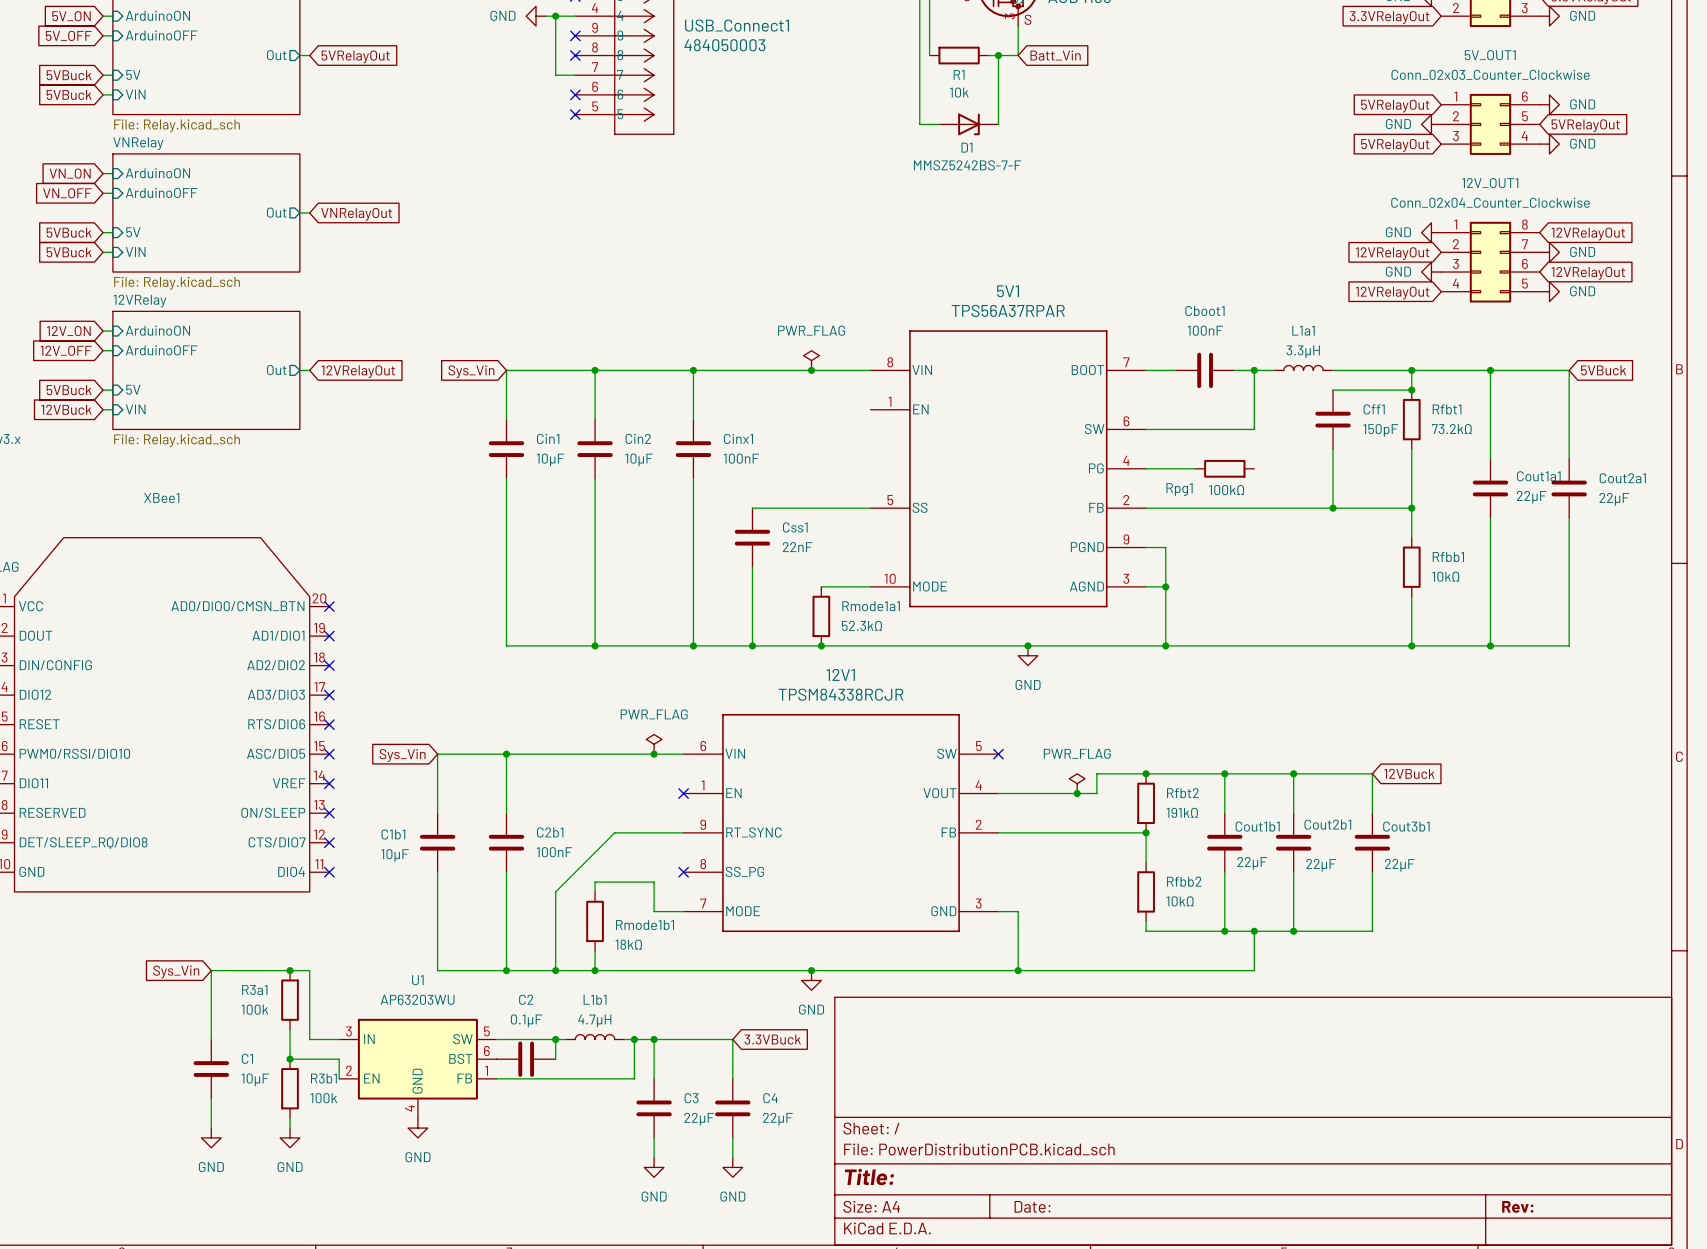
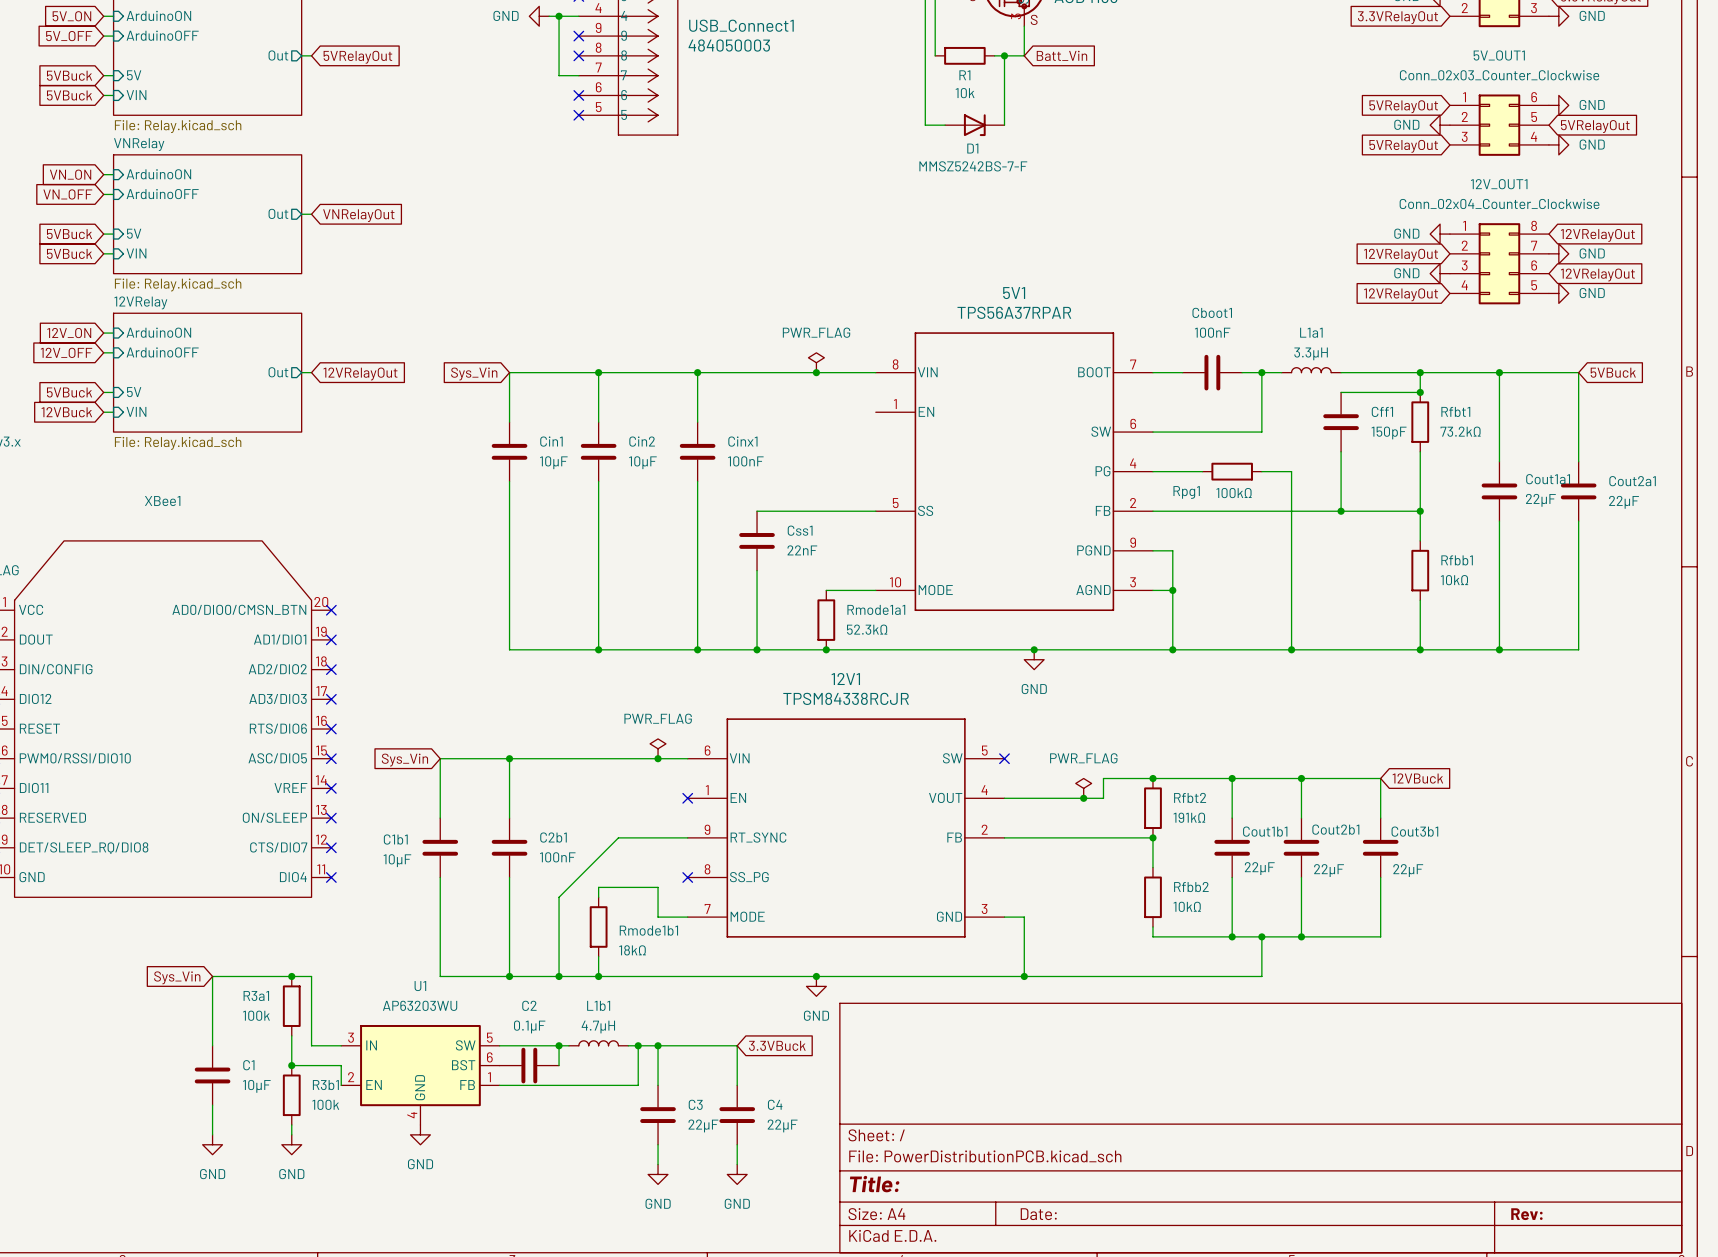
wire: none -> (1261, 471) (1291, 471) (1291, 649)
junction: none -> (1291, 649)

